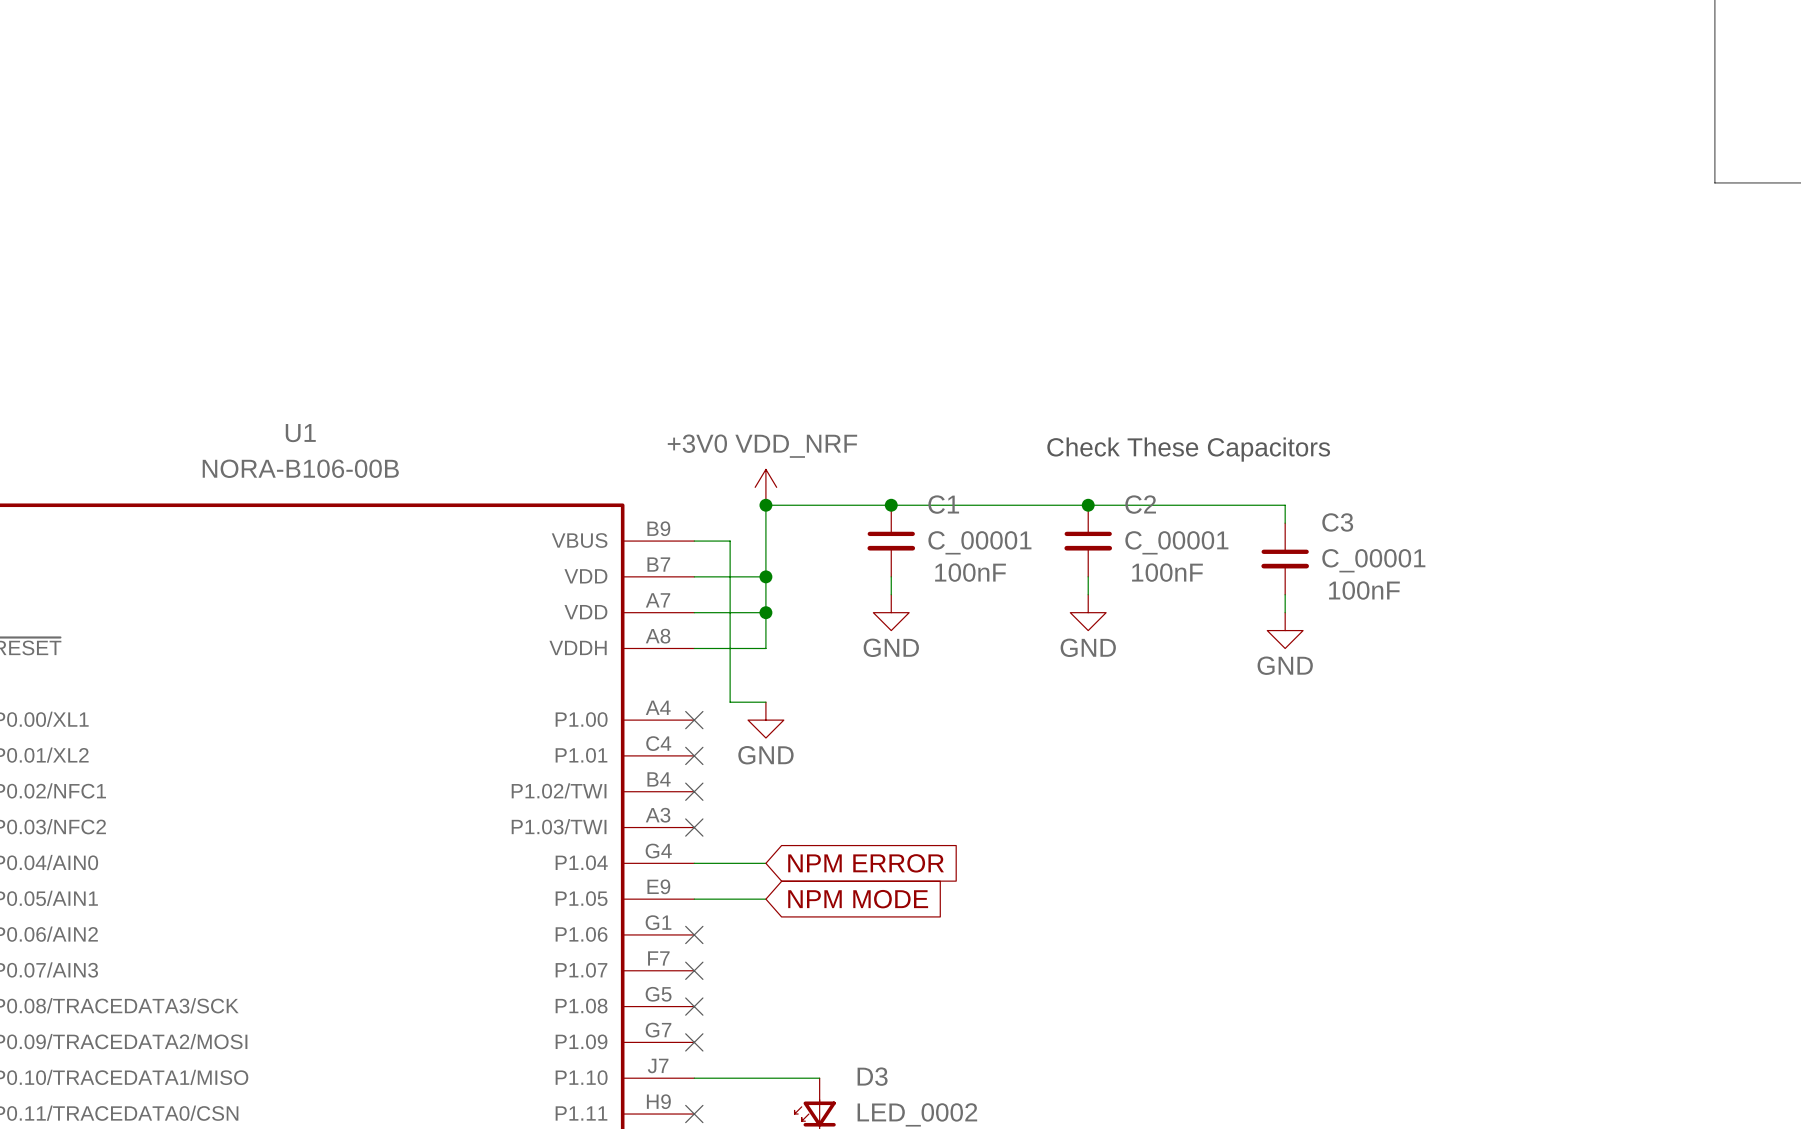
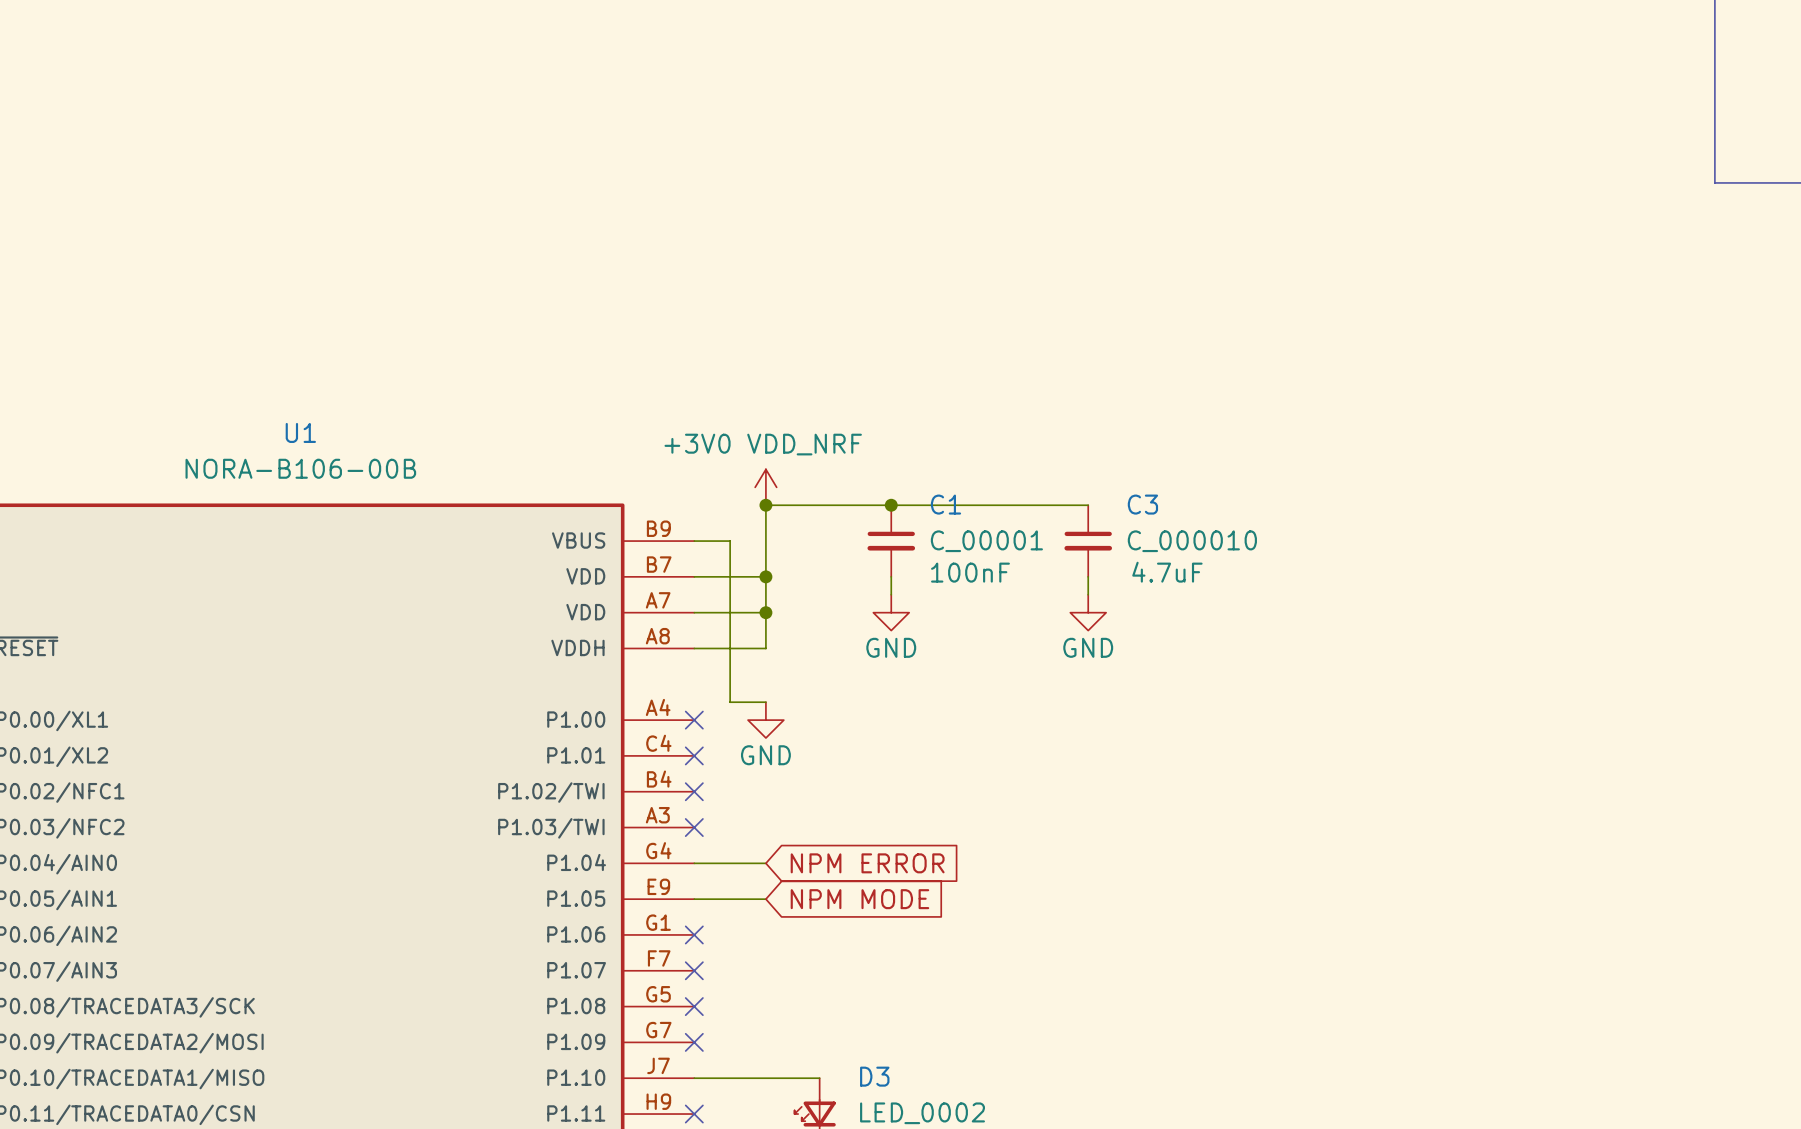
text: Check These Capacitors (1188, 449) -> none
C2 name: C2 (1140, 504) -> C3 (1142, 504)
wire: (1088, 505) (1285, 505) (1285, 523) -> none
junction: (1088, 505) -> none
C2 value: C_00001 (1176, 542) -> C_000010 (1192, 541)
C3: C_00001 (1285, 558) -> none
C2 text: 100nF (1167, 572) -> 4.7uF (1167, 572)
wire: (1285, 594) (1285, 612) -> none
power symbol: GND (1285, 630) -> none

